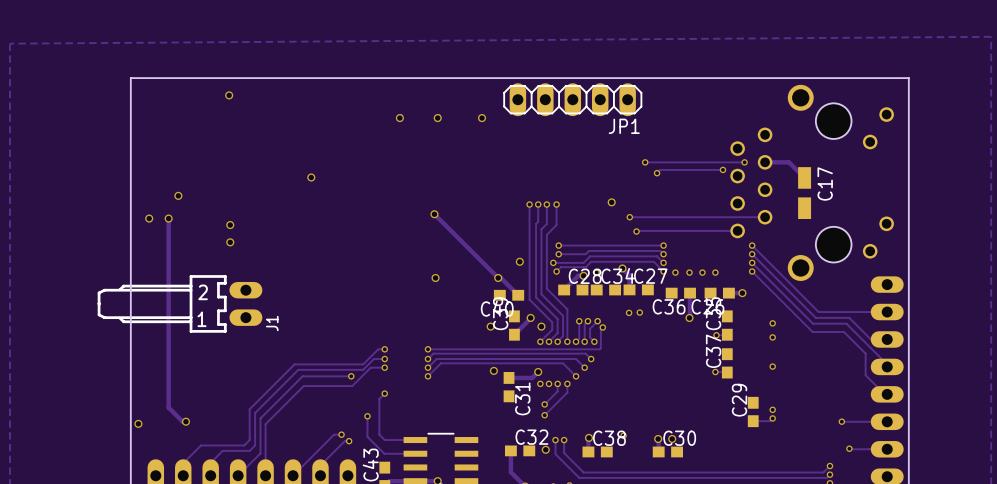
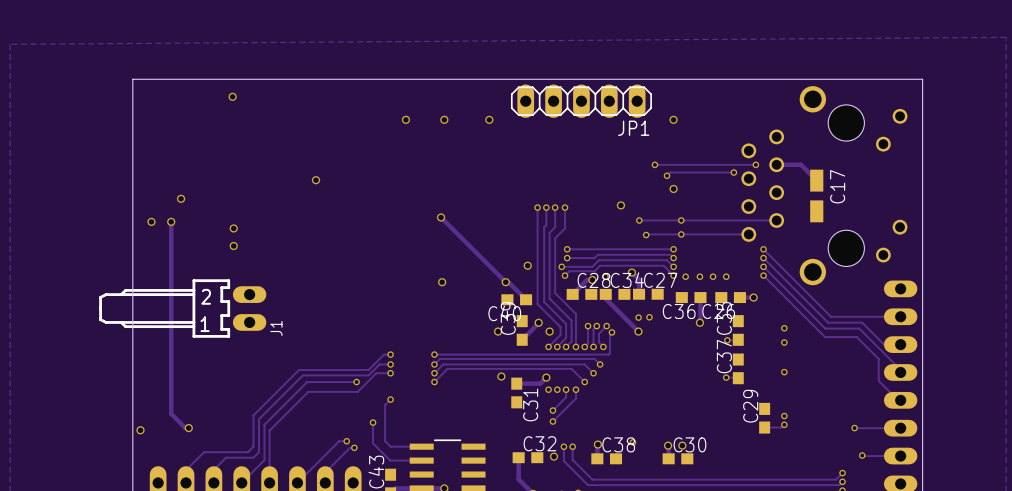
via: none -> (673, 119)
via: none -> (673, 188)
via: none -> (681, 220)
via: none -> (681, 234)
track: none -> (605, 294) (605, 298) (638, 331)
via: none -> (638, 331)

